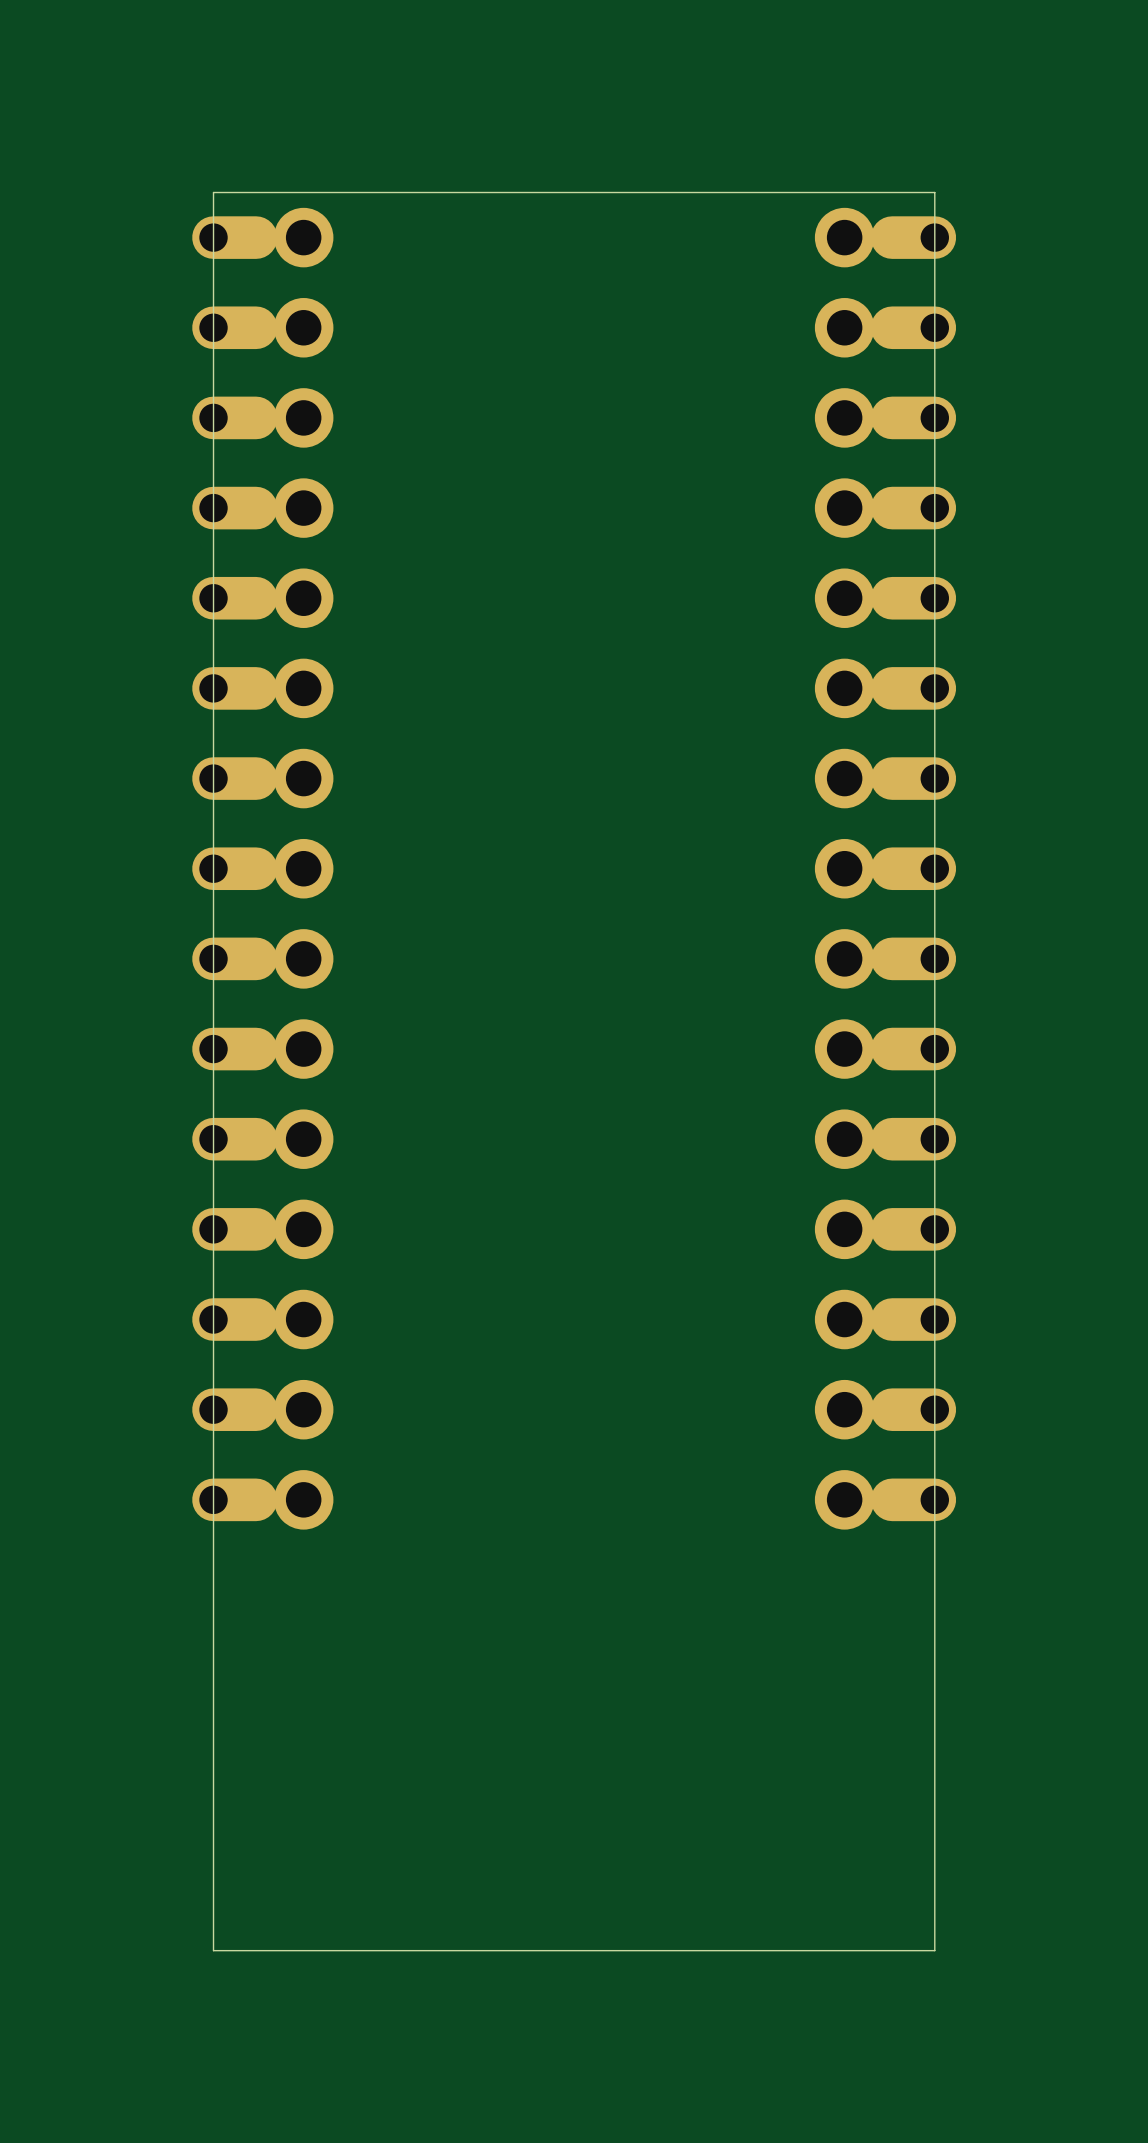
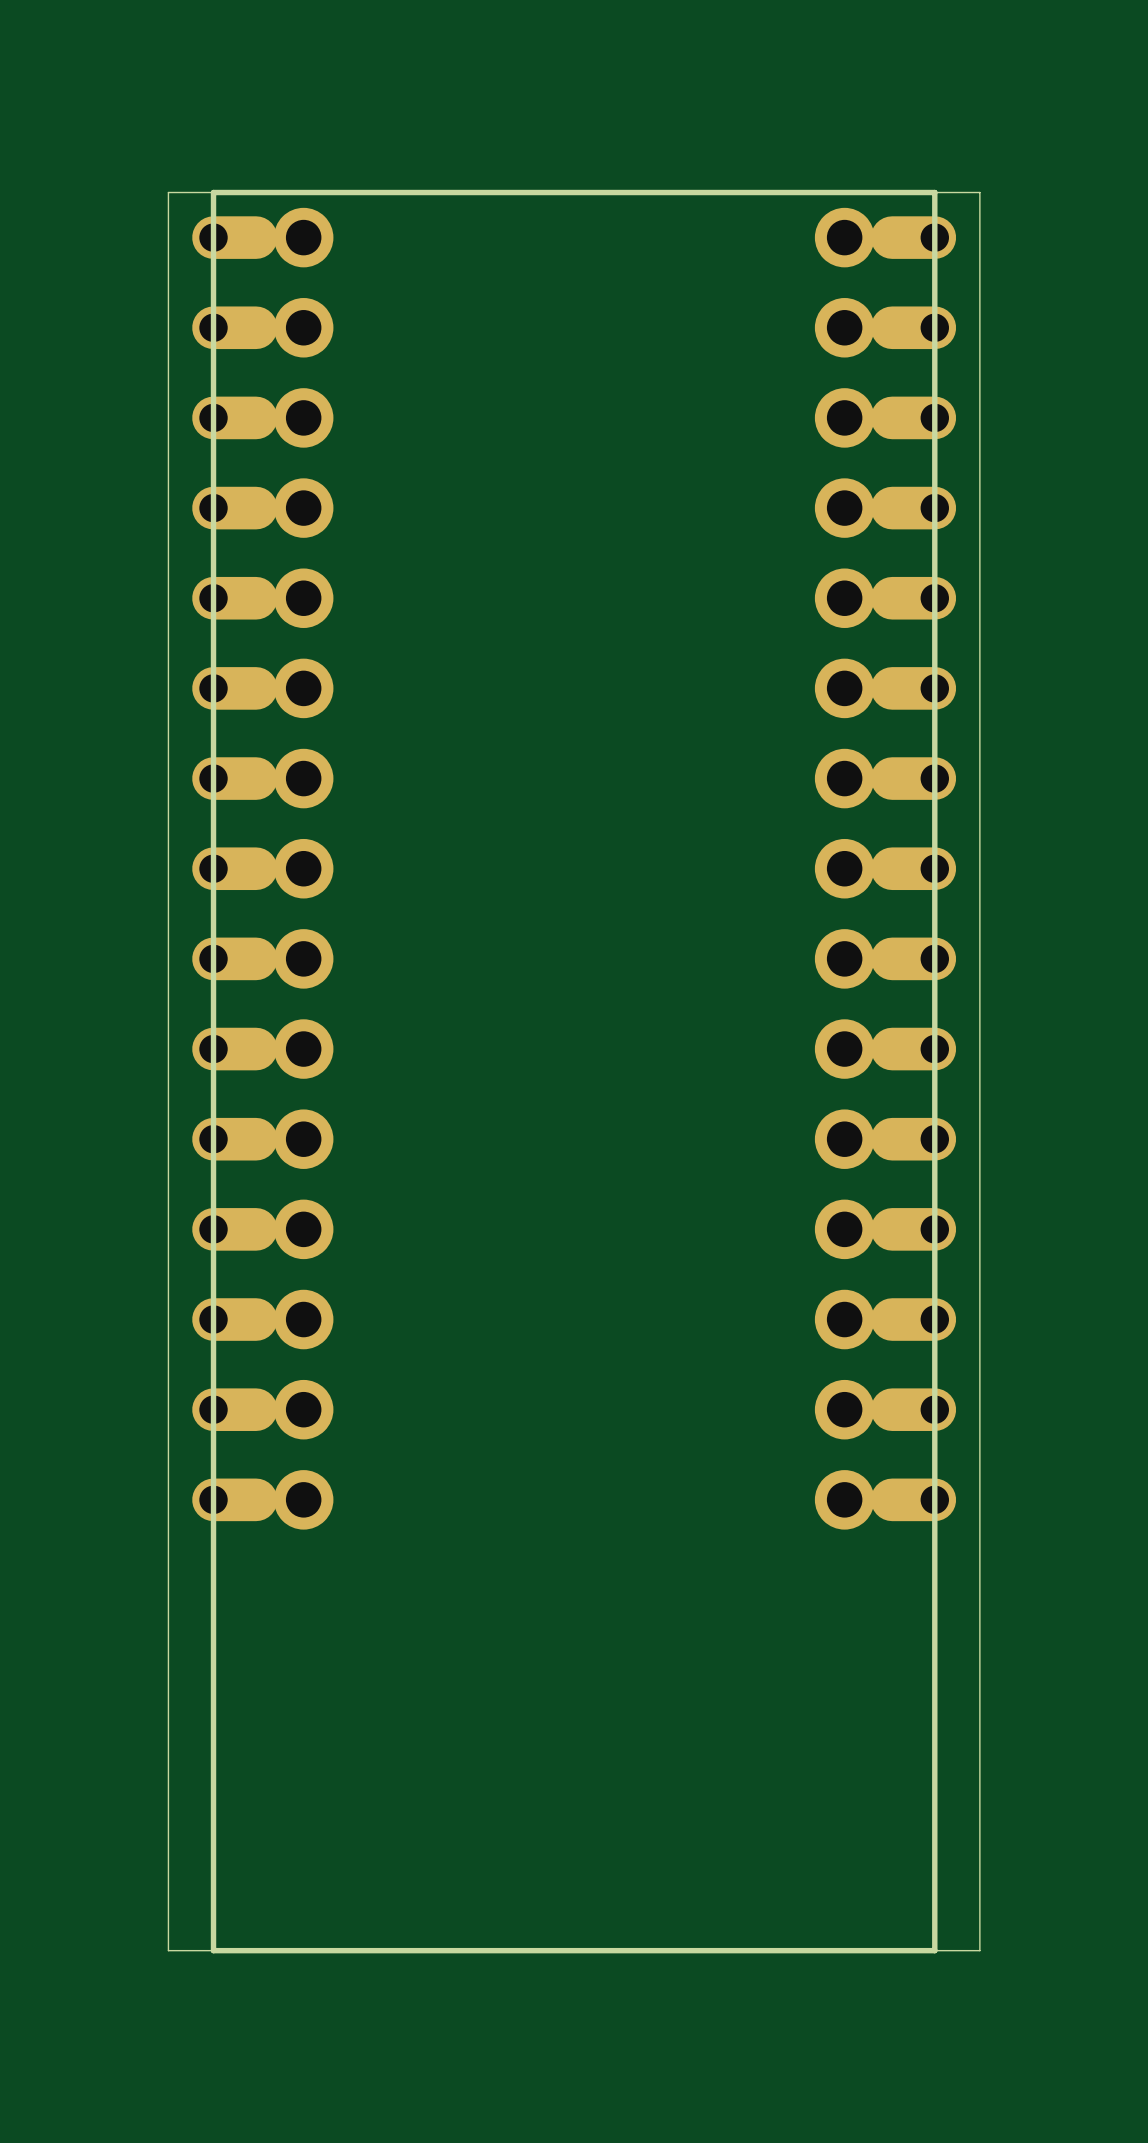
board edge width: thin (213, 192) (213, 1950) -> thick (213, 192) (213, 1950)
board edge width: thin (934, 192) (934, 1950) -> thick (934, 192) (934, 1950)
board edge: none -> (979, 192) (168, 192) (168, 1950) (979, 1950) (979, 192)

